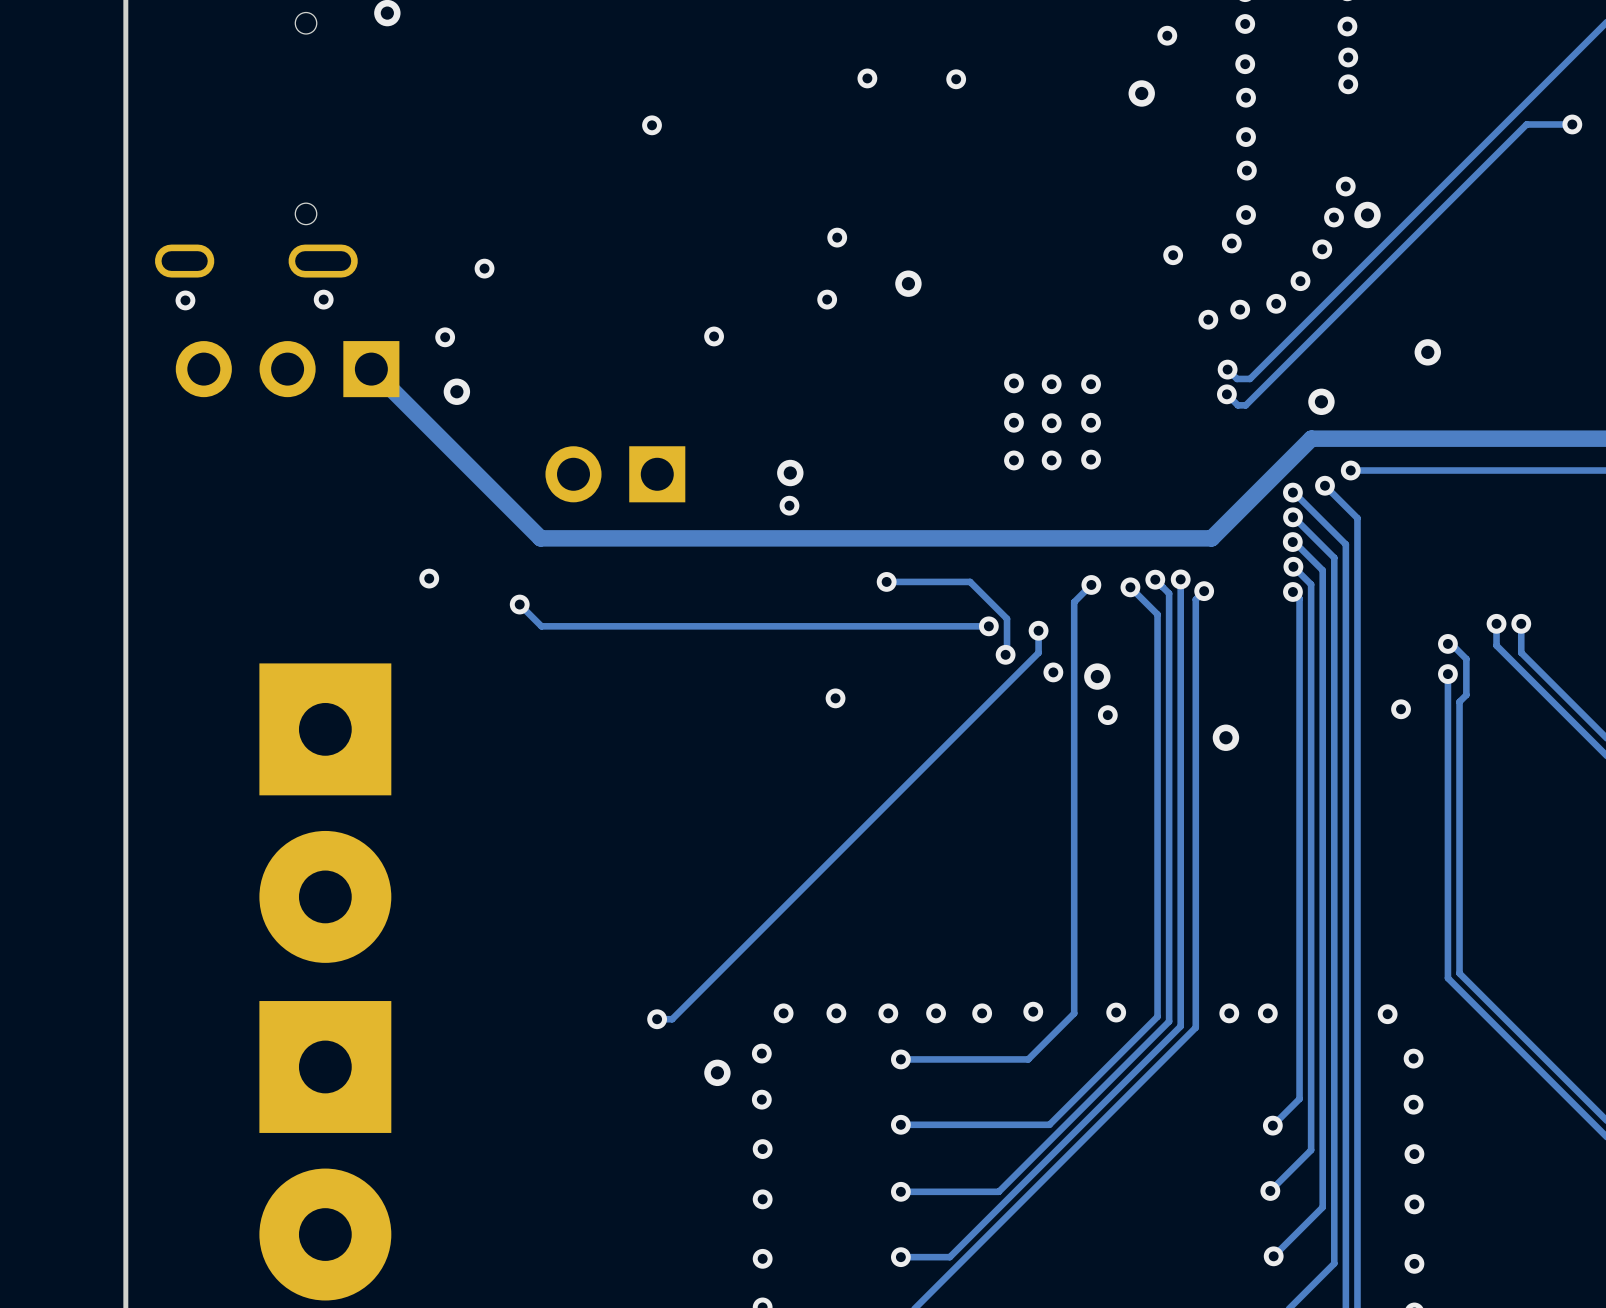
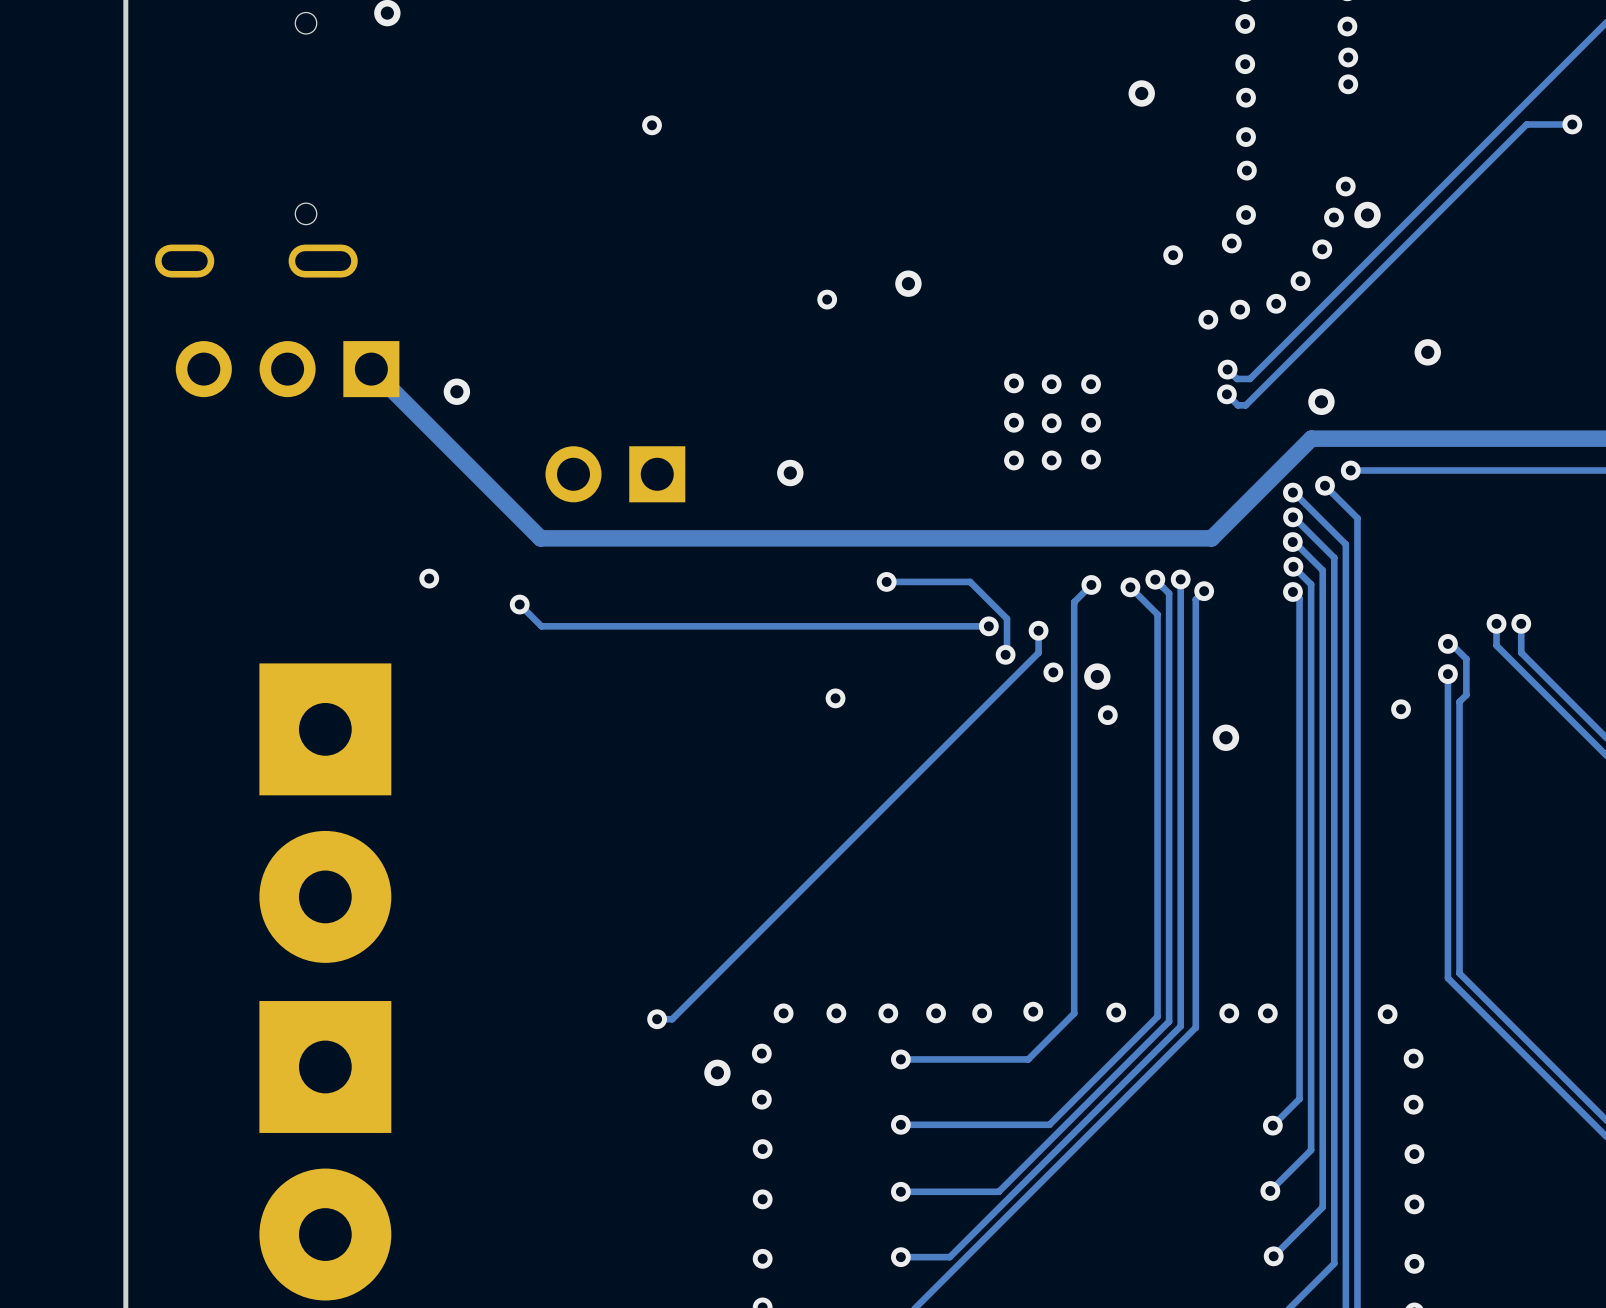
via: (1167, 35) -> none
via: (867, 78) -> none
via: (956, 79) -> none
via: (837, 237) -> none
via: (484, 268) -> none
via: (323, 299) -> none
via: (185, 300) -> none
via: (714, 336) -> none
via: (445, 337) -> none
via: (789, 505) -> none

